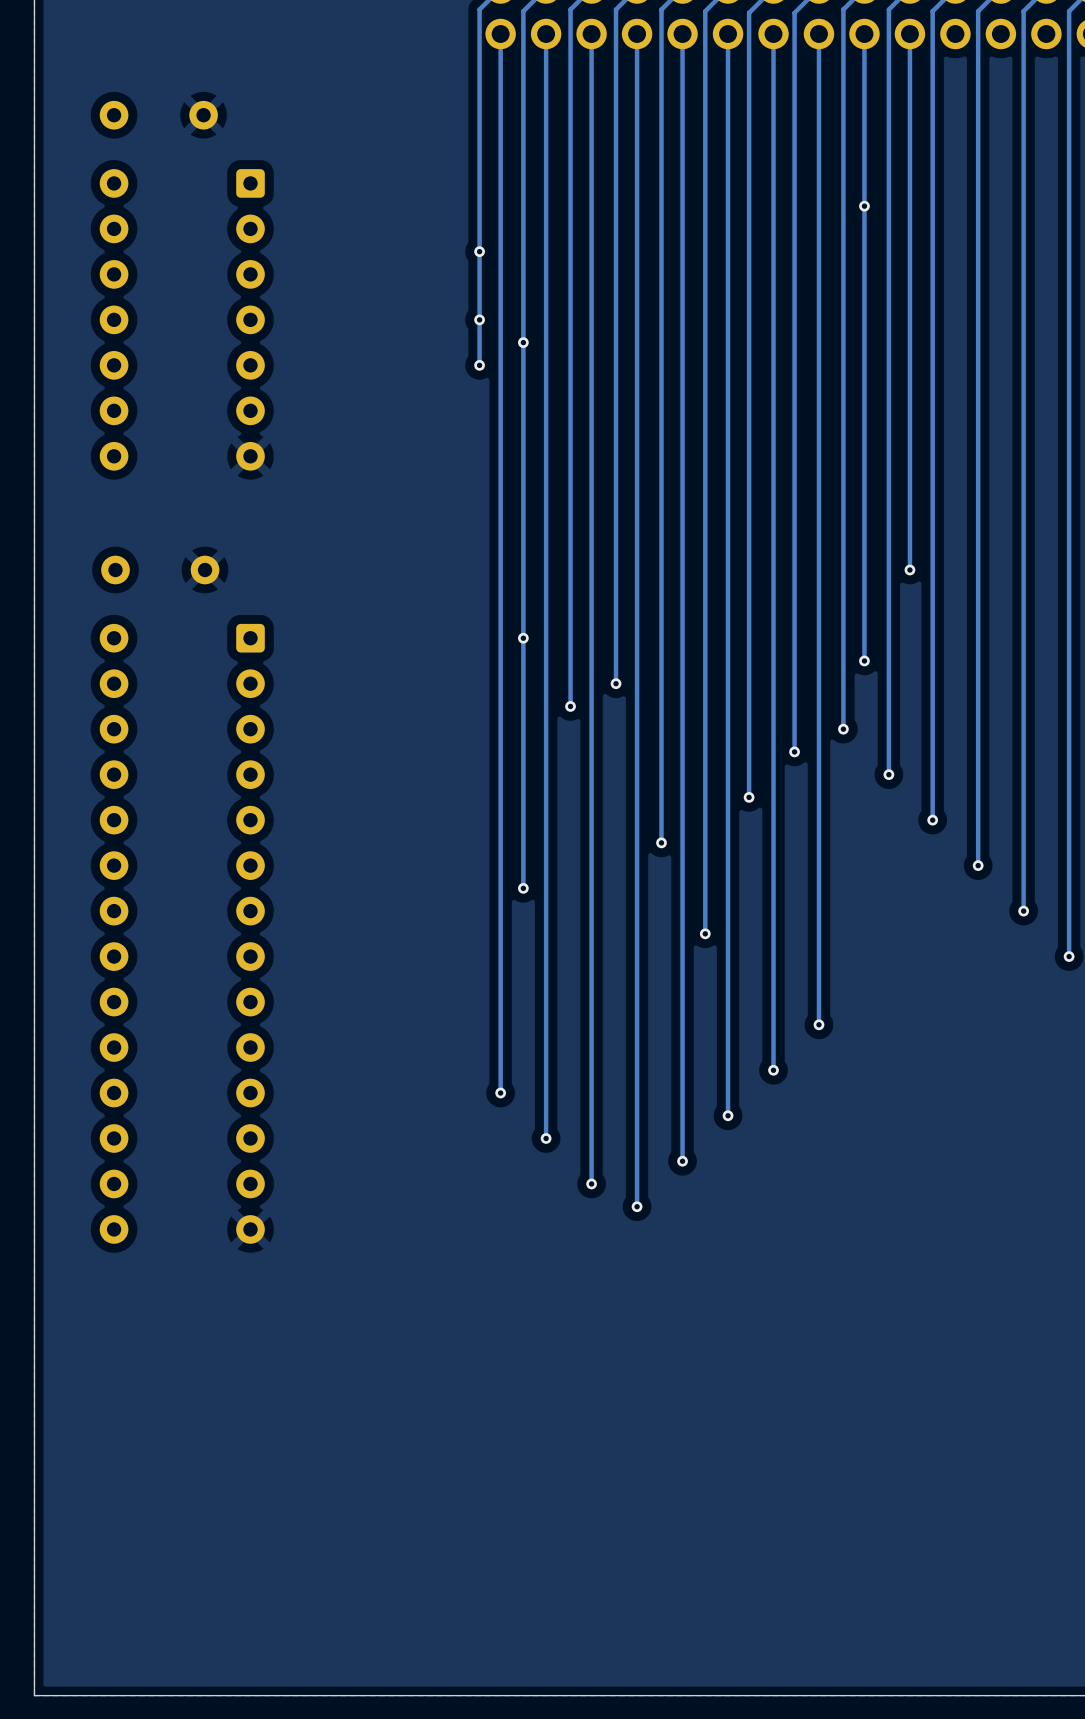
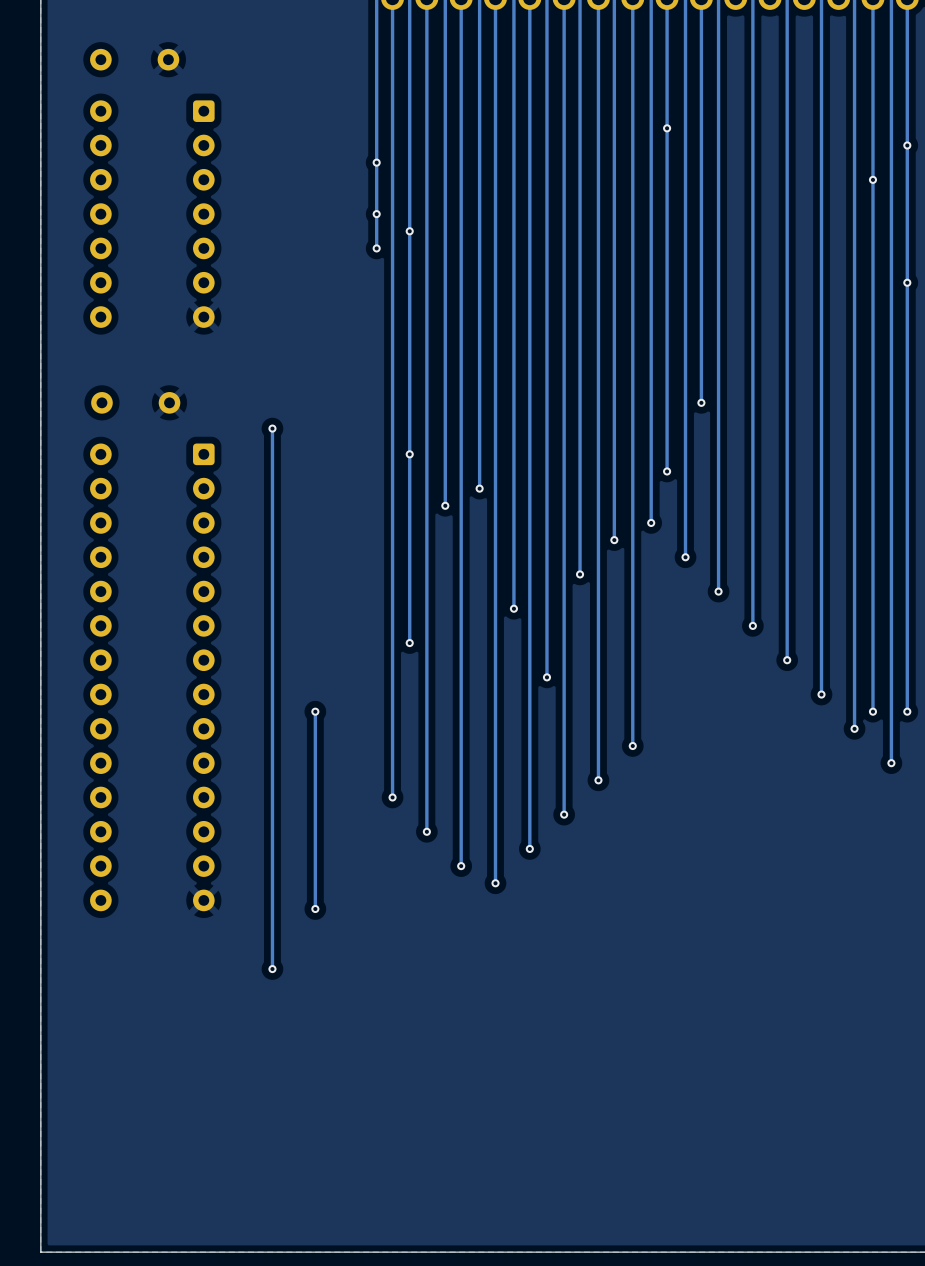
track: none -> (272, 428) (272, 969)
via: none -> (272, 428)
track: none -> (315, 711) (315, 909)
via: none -> (315, 711)
via: none -> (315, 909)
via: none -> (272, 969)

